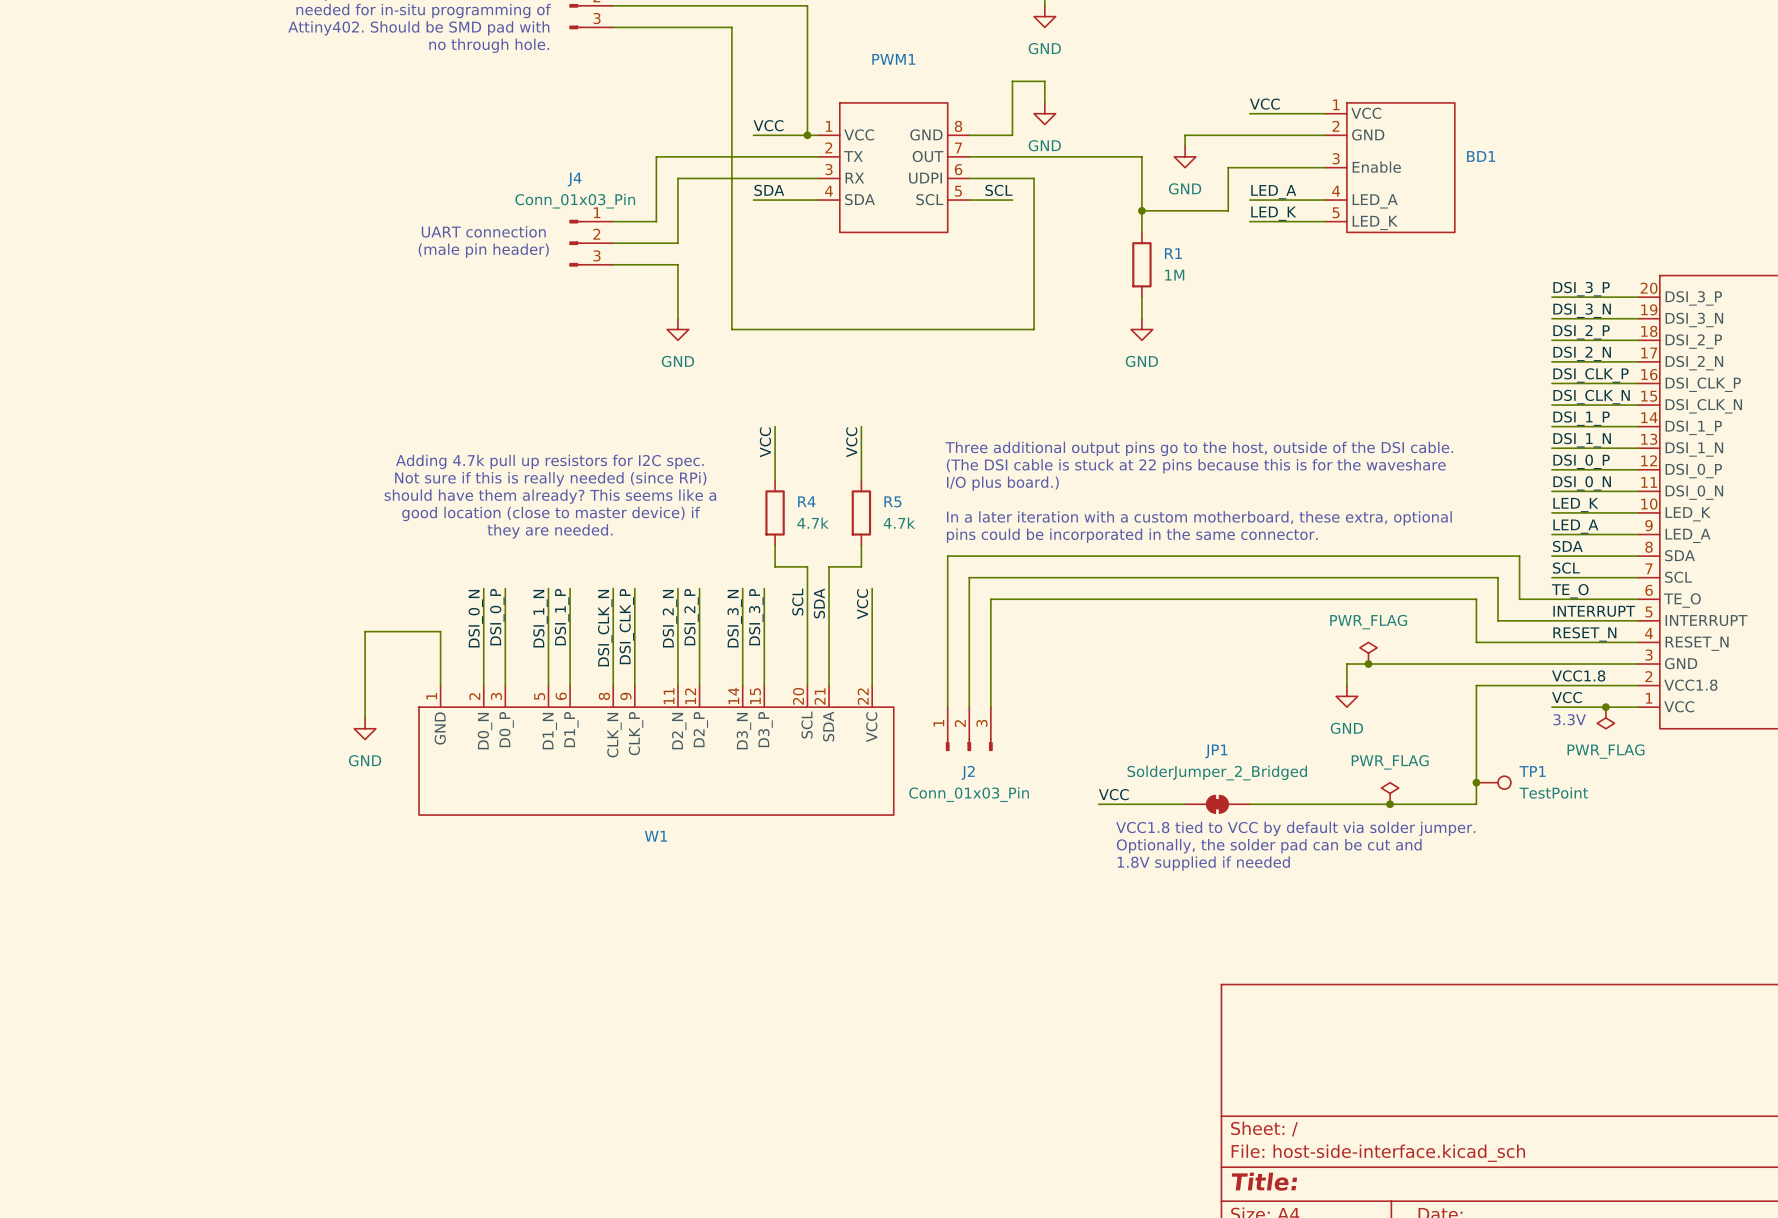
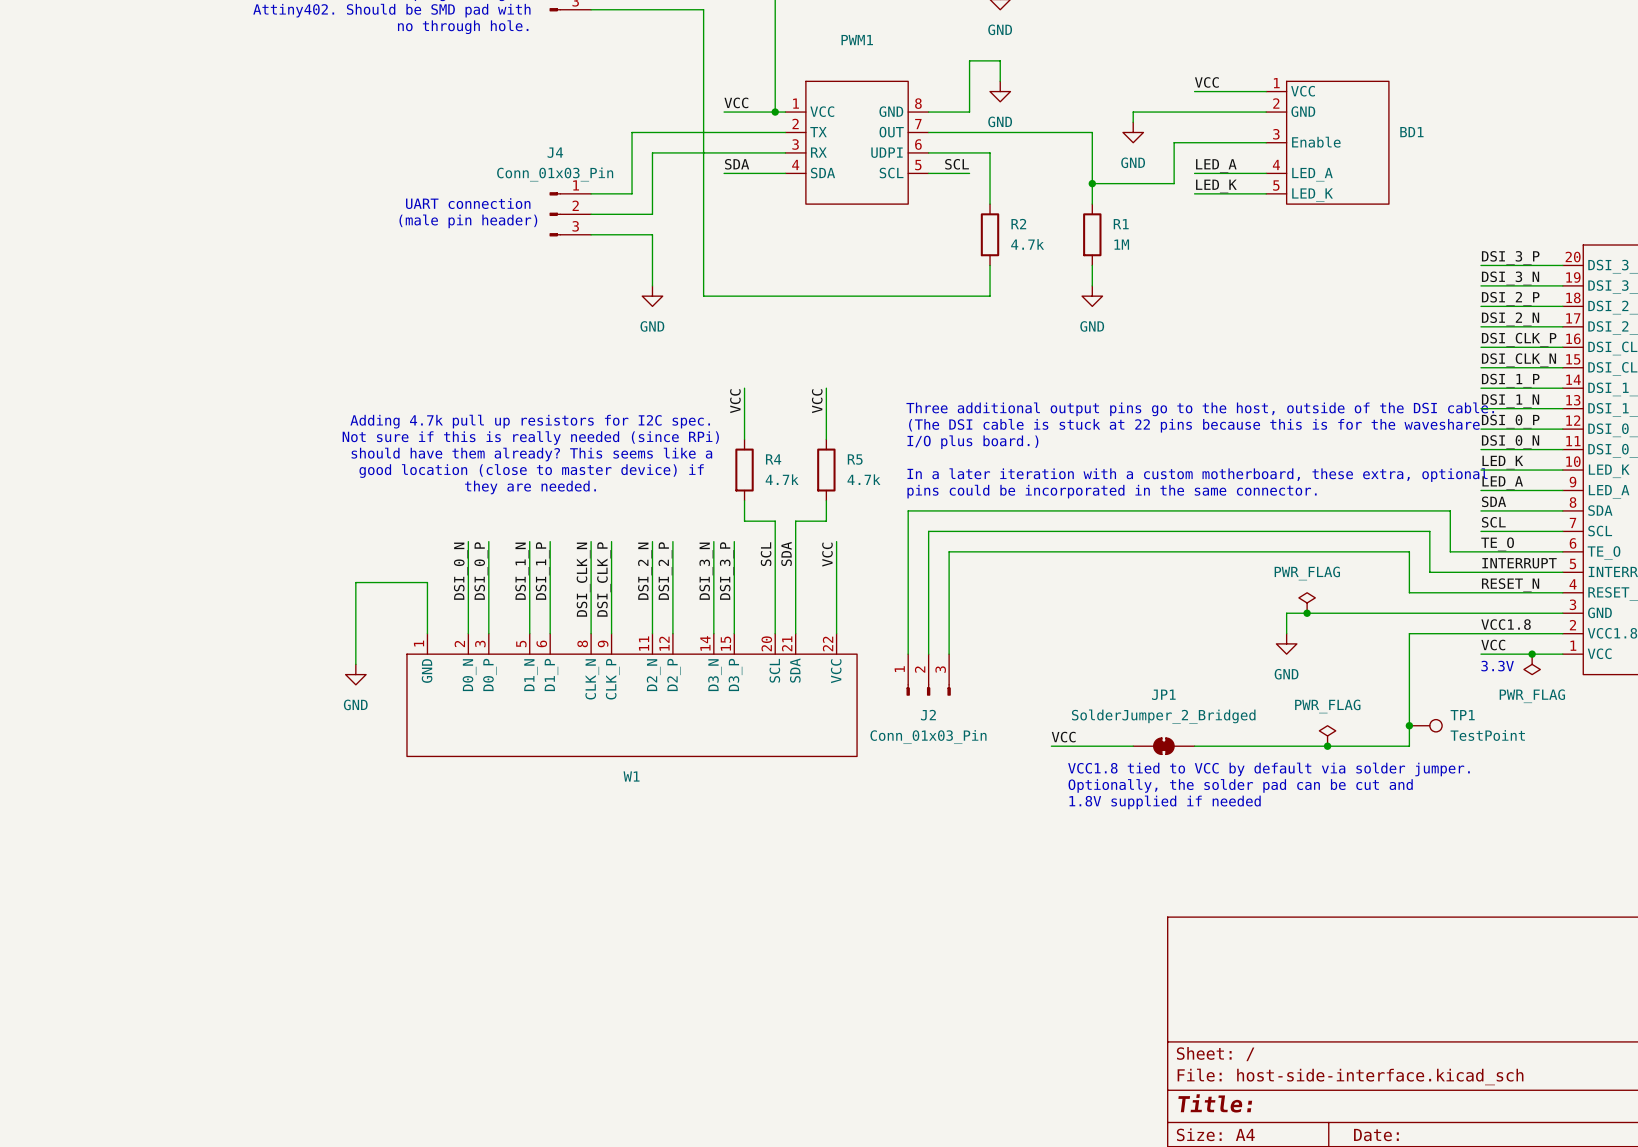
wire: (1034, 232) (1034, 297) -> none
R2: none -> 4.7k (990, 234)

